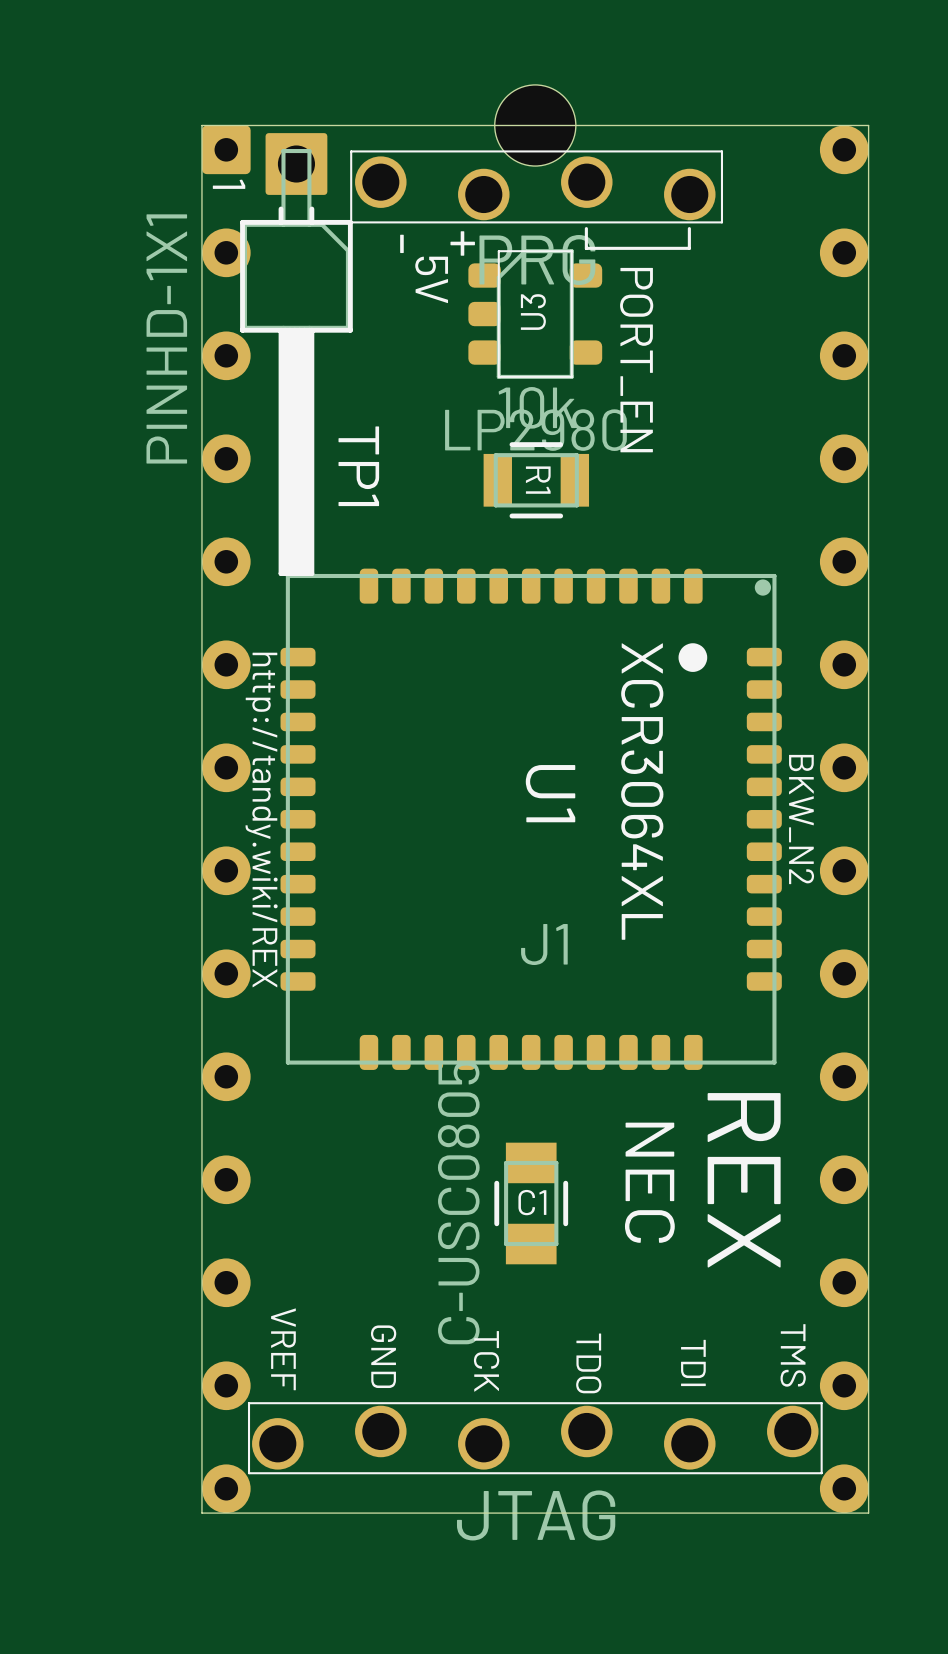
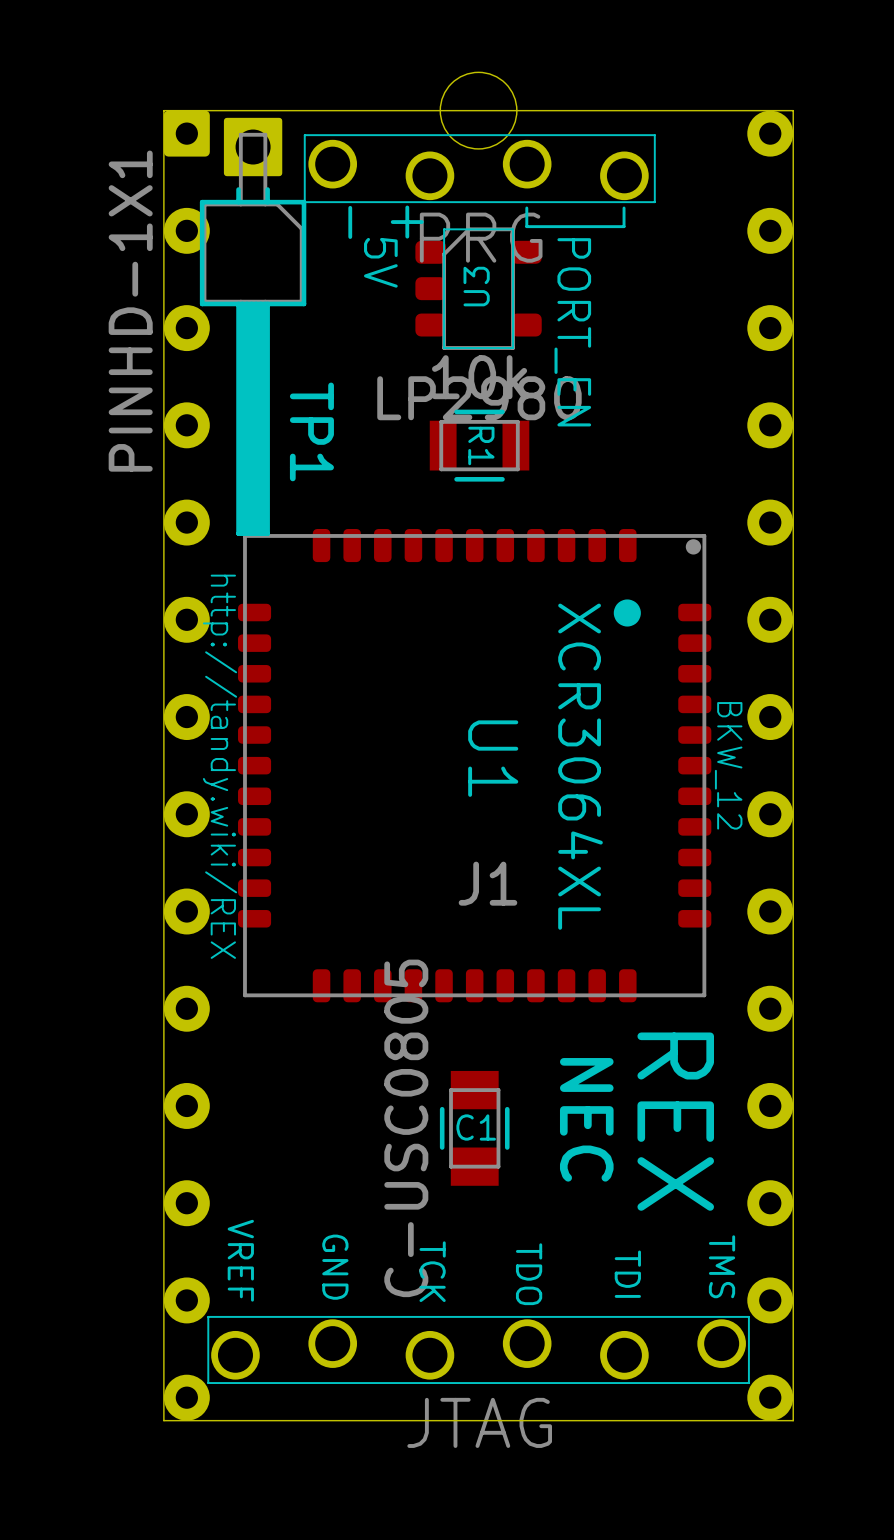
text: 1 (229, 184) -> none
text: BKW_N2 (801, 819) -> BKW_12 (728, 765)

